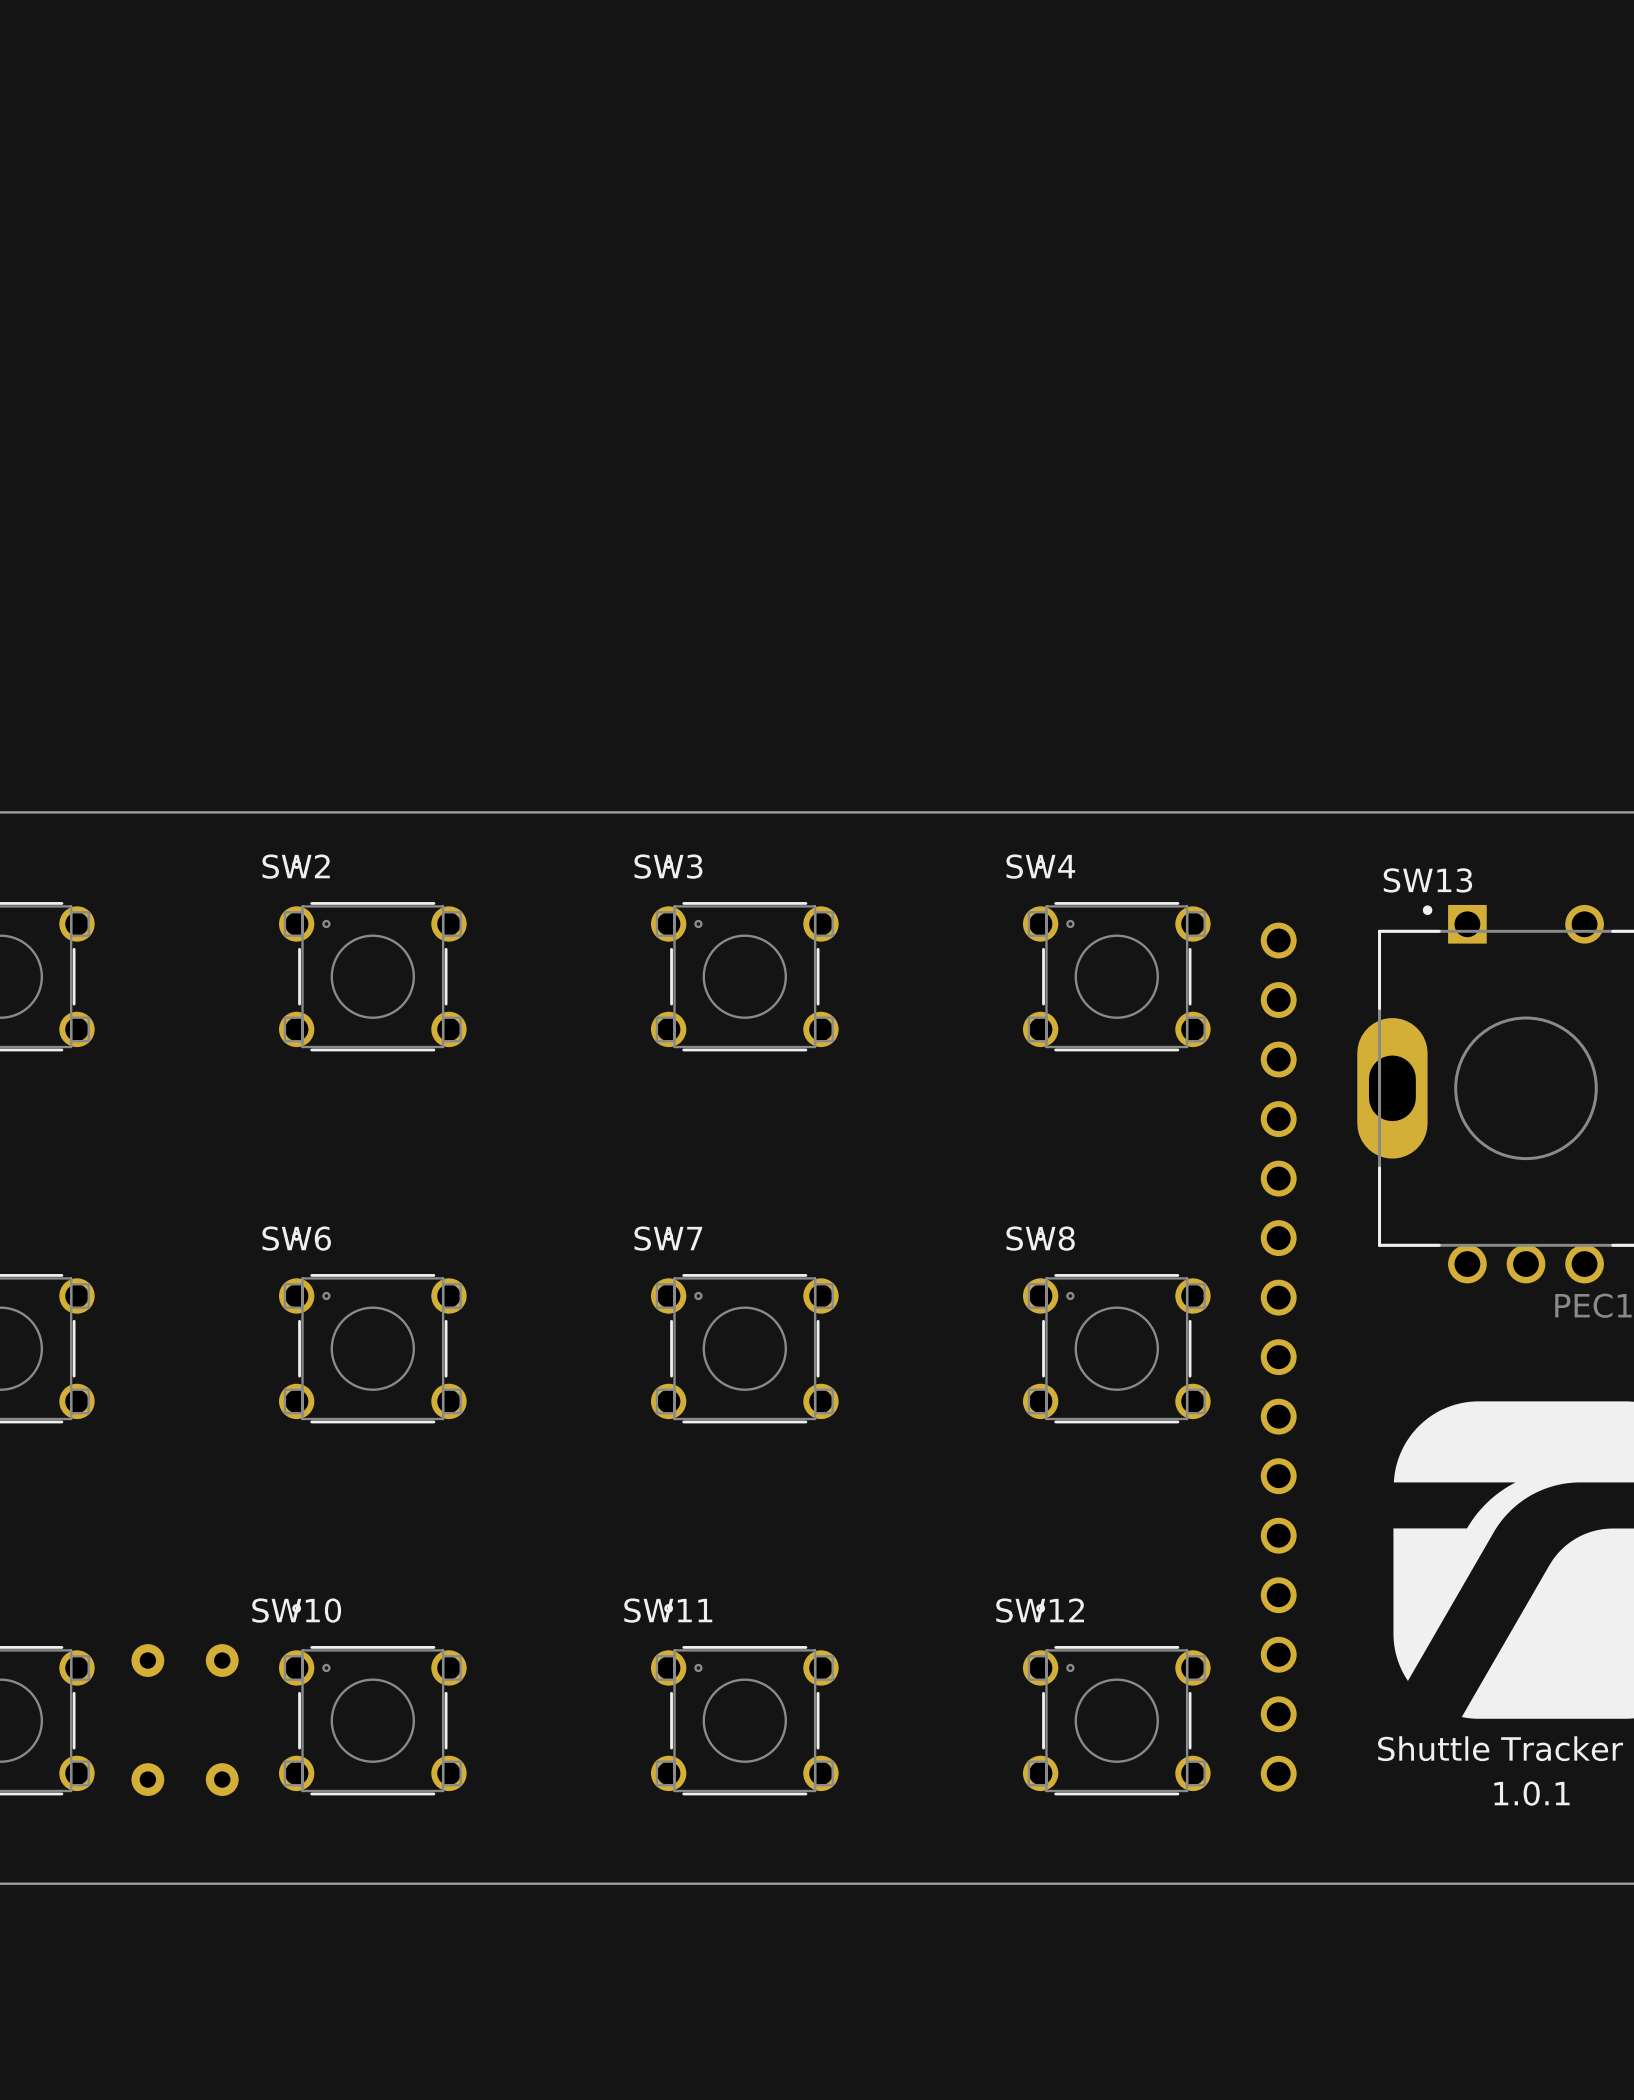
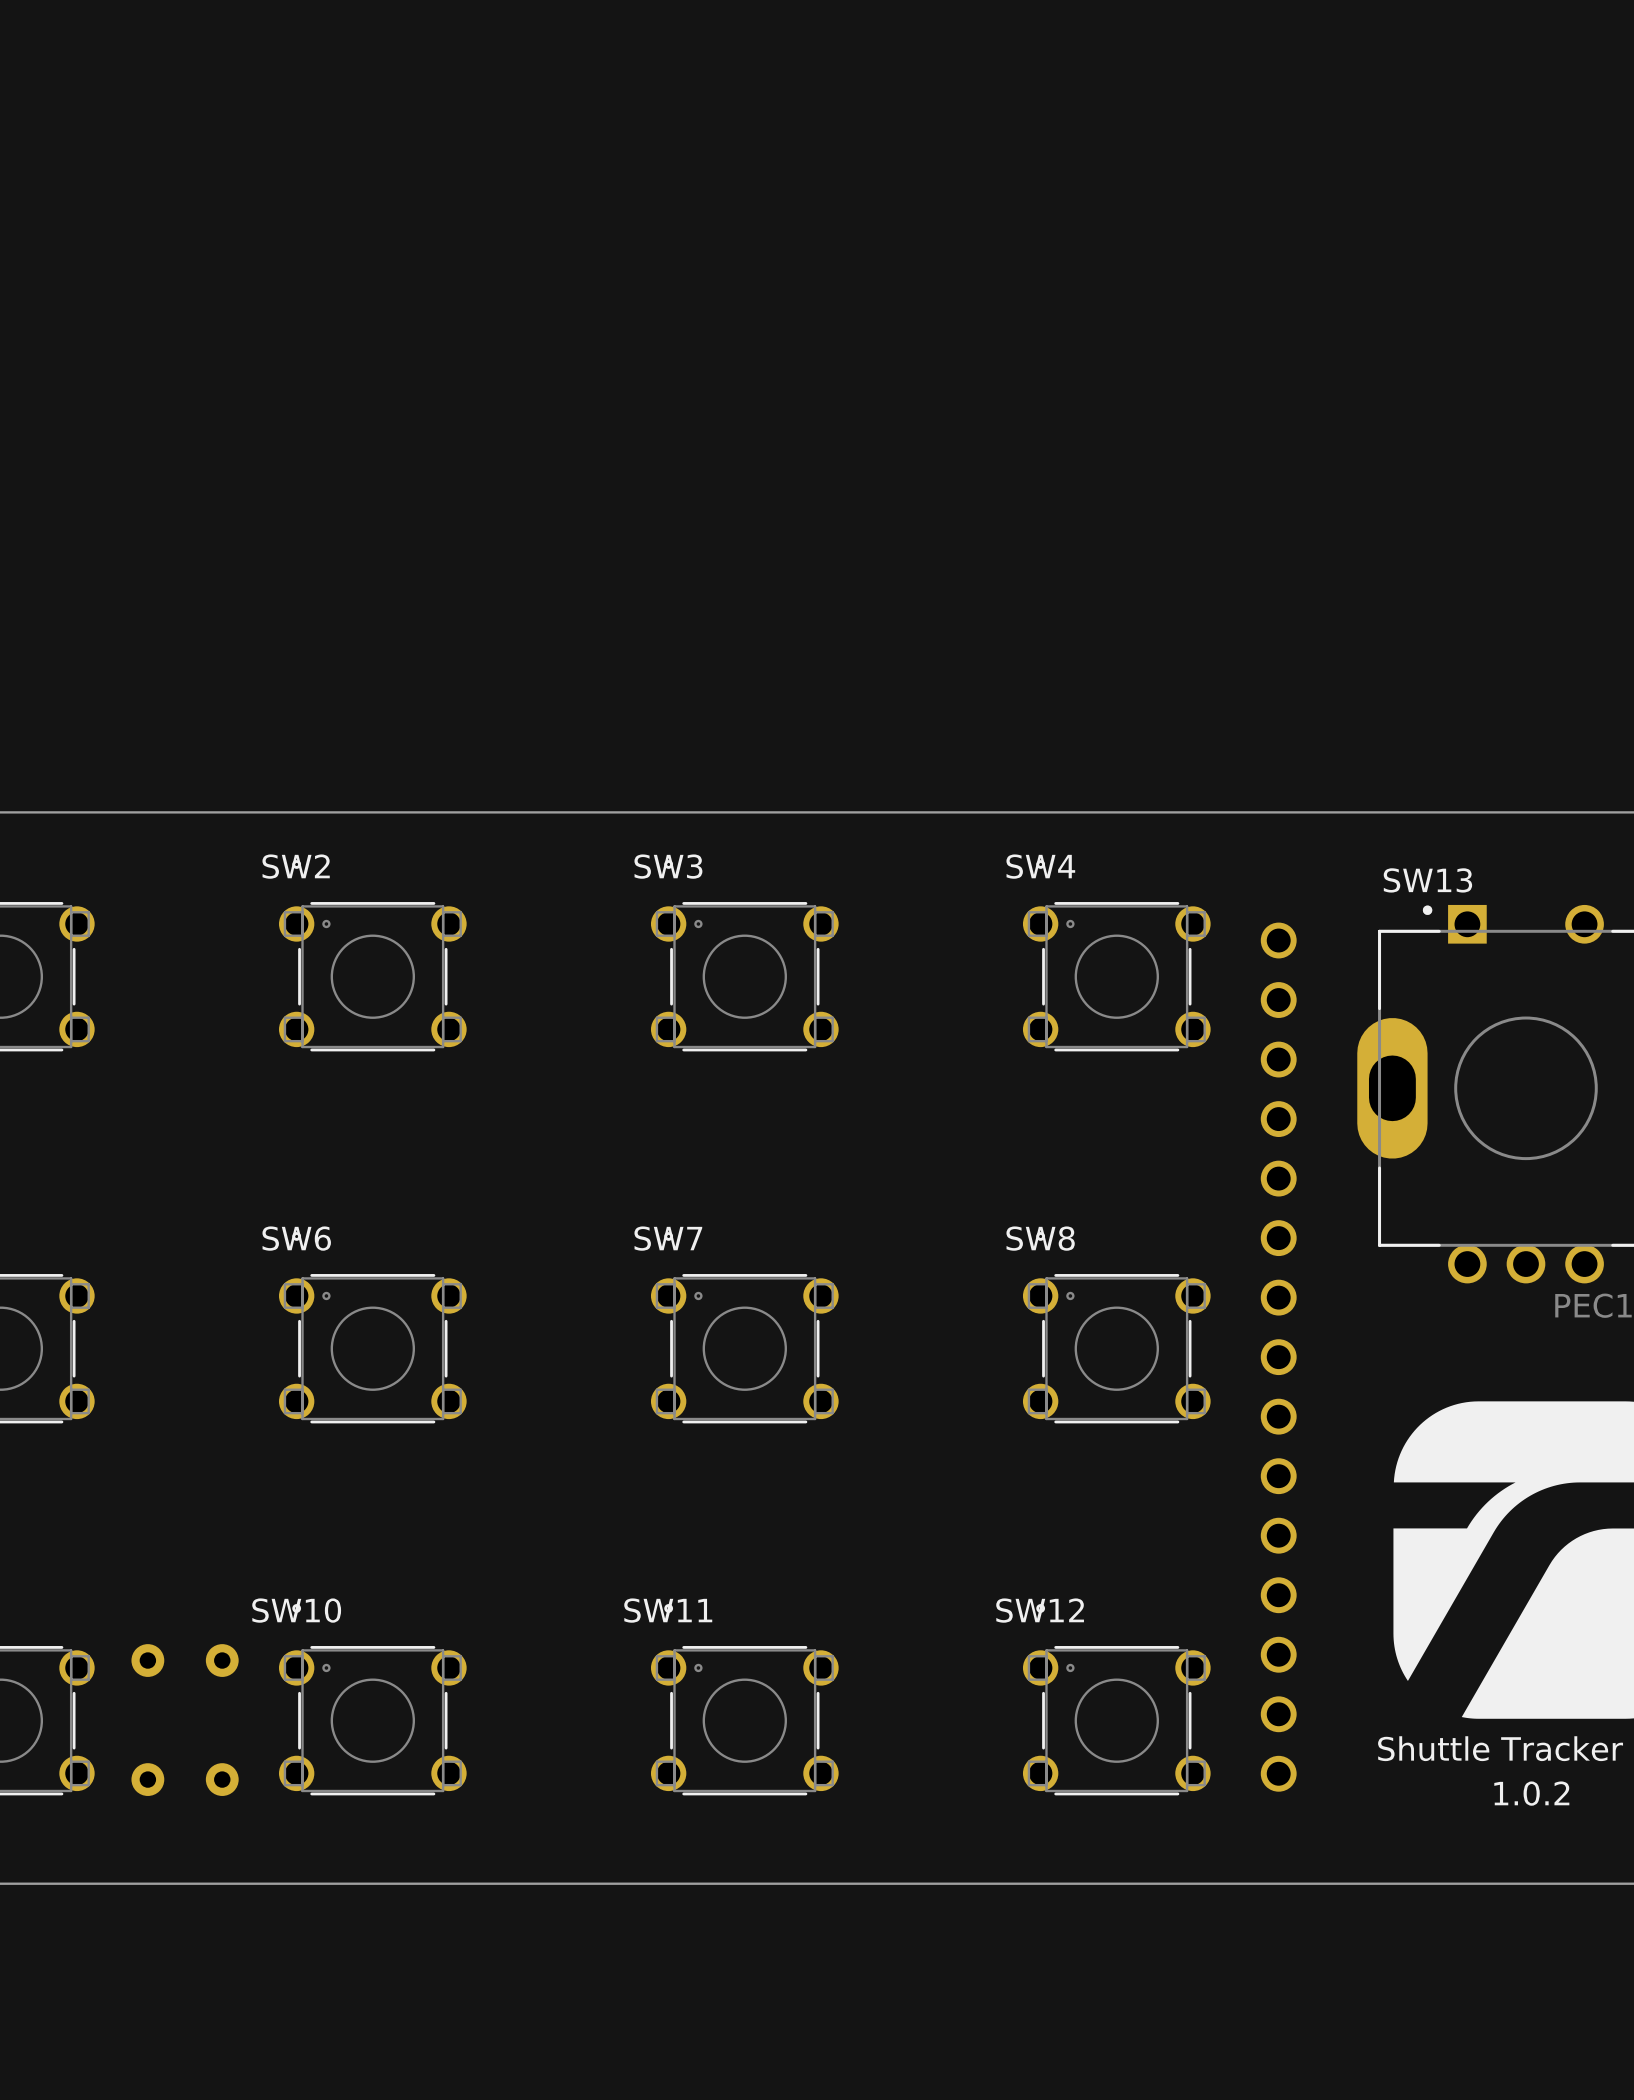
text: 1.0.1 (1531, 1793) -> 1.0.2 (1531, 1793)

